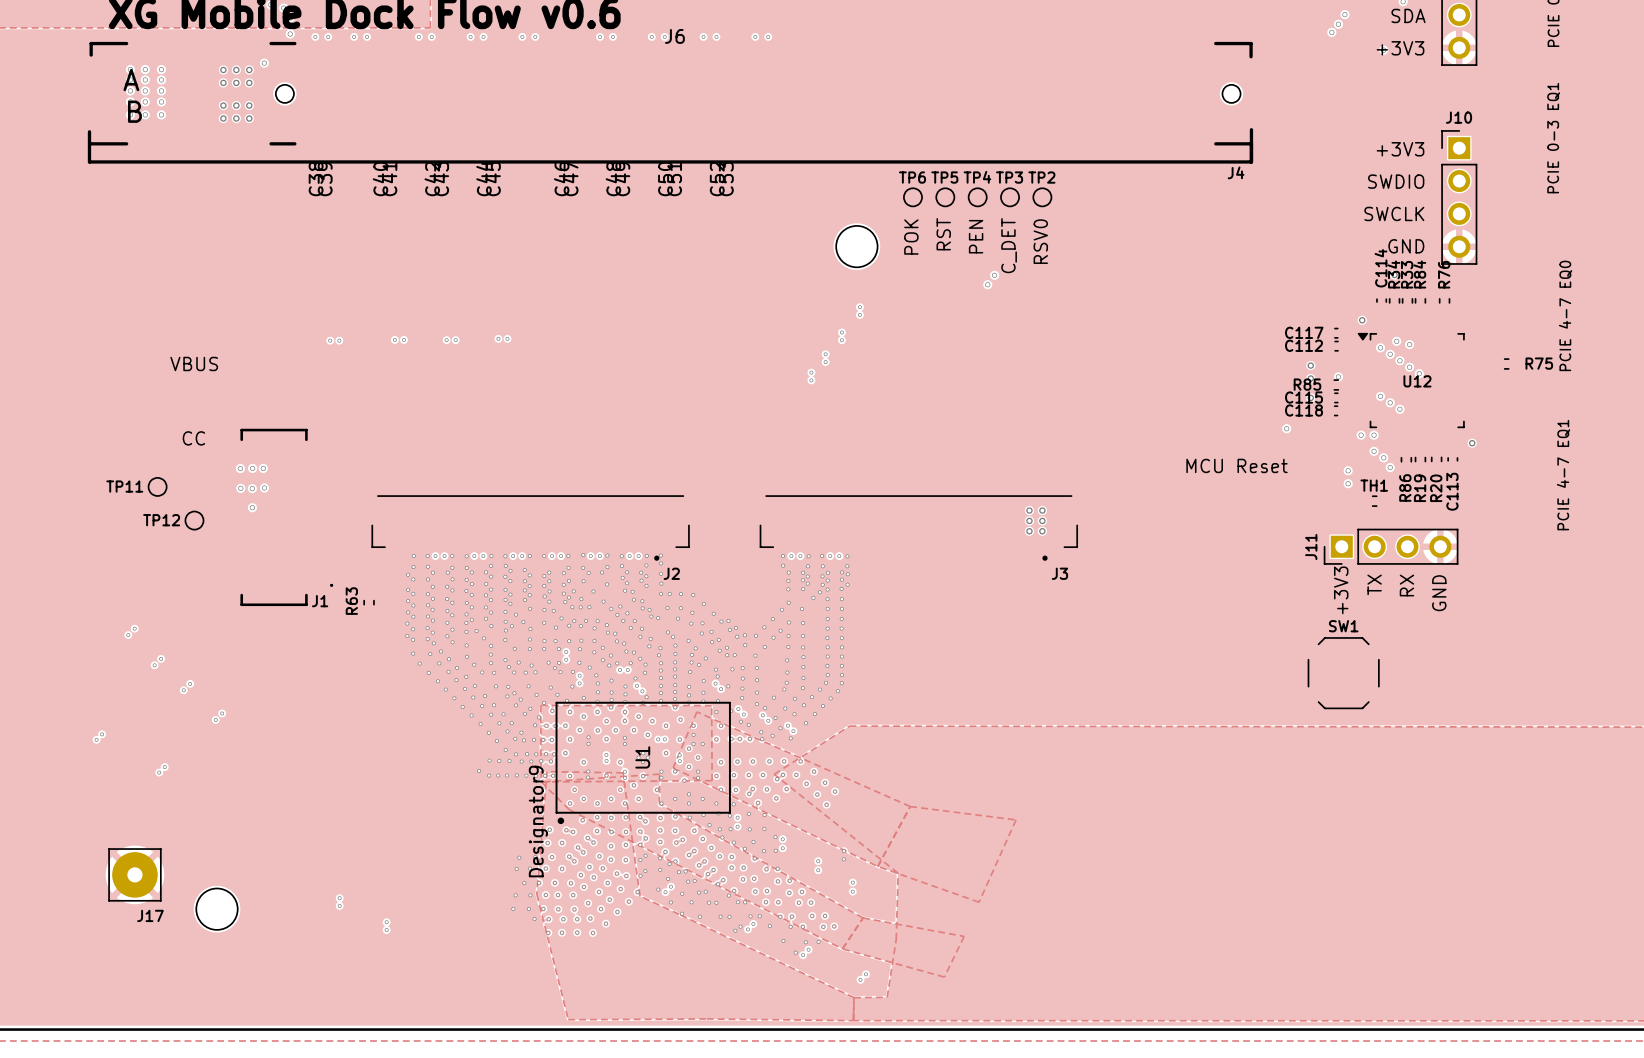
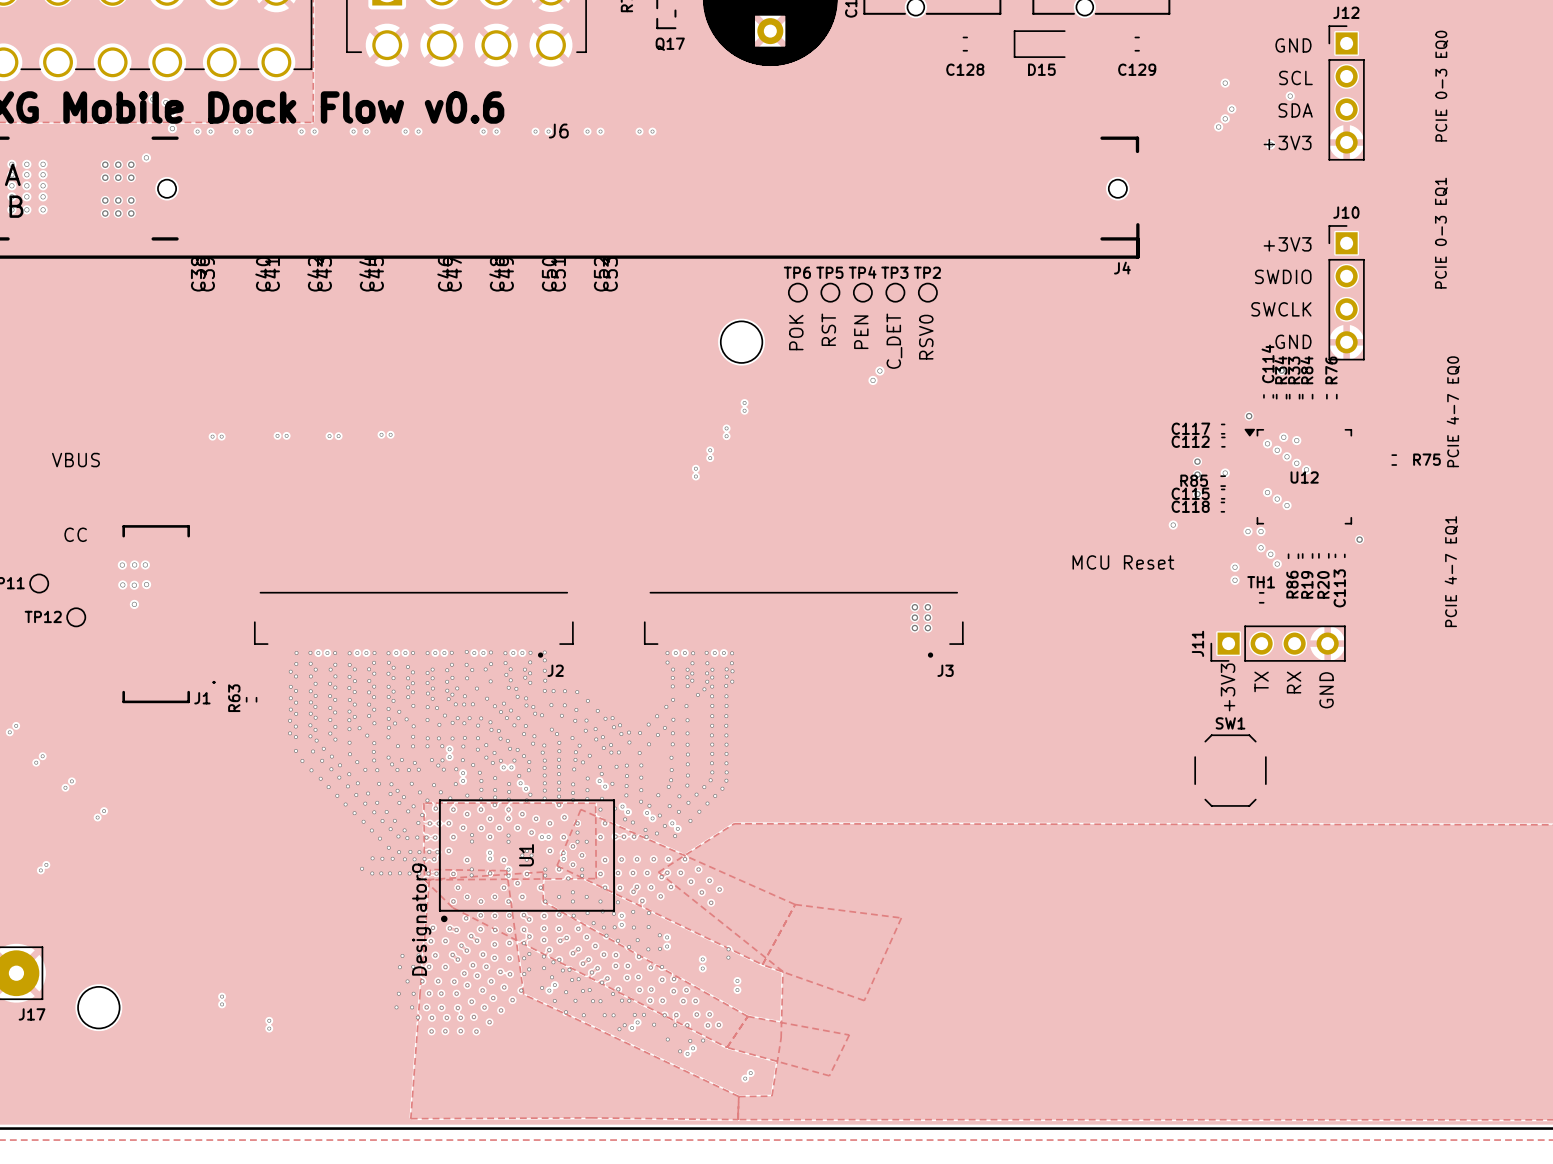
zone outline: (536, 894) (568, 1019) (706, 1018) -> (420, 992) (410, 1118) (590, 1117)

